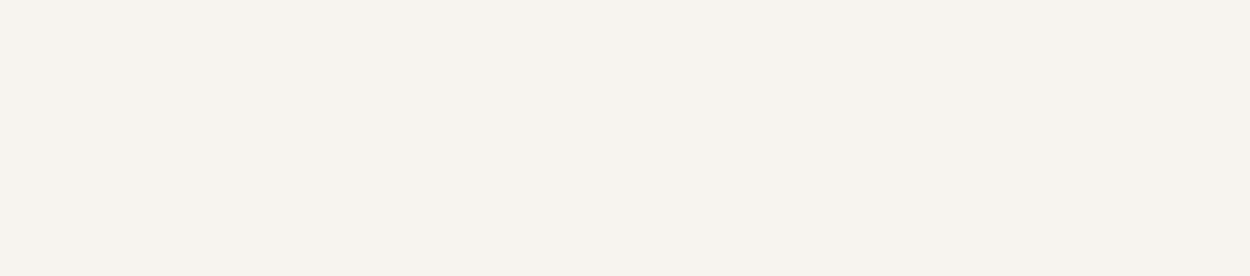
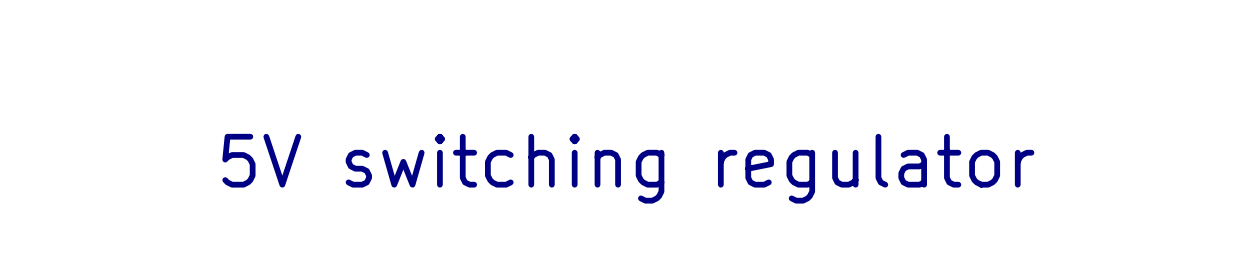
text: none -> 5V switching regulator (628, 168)

